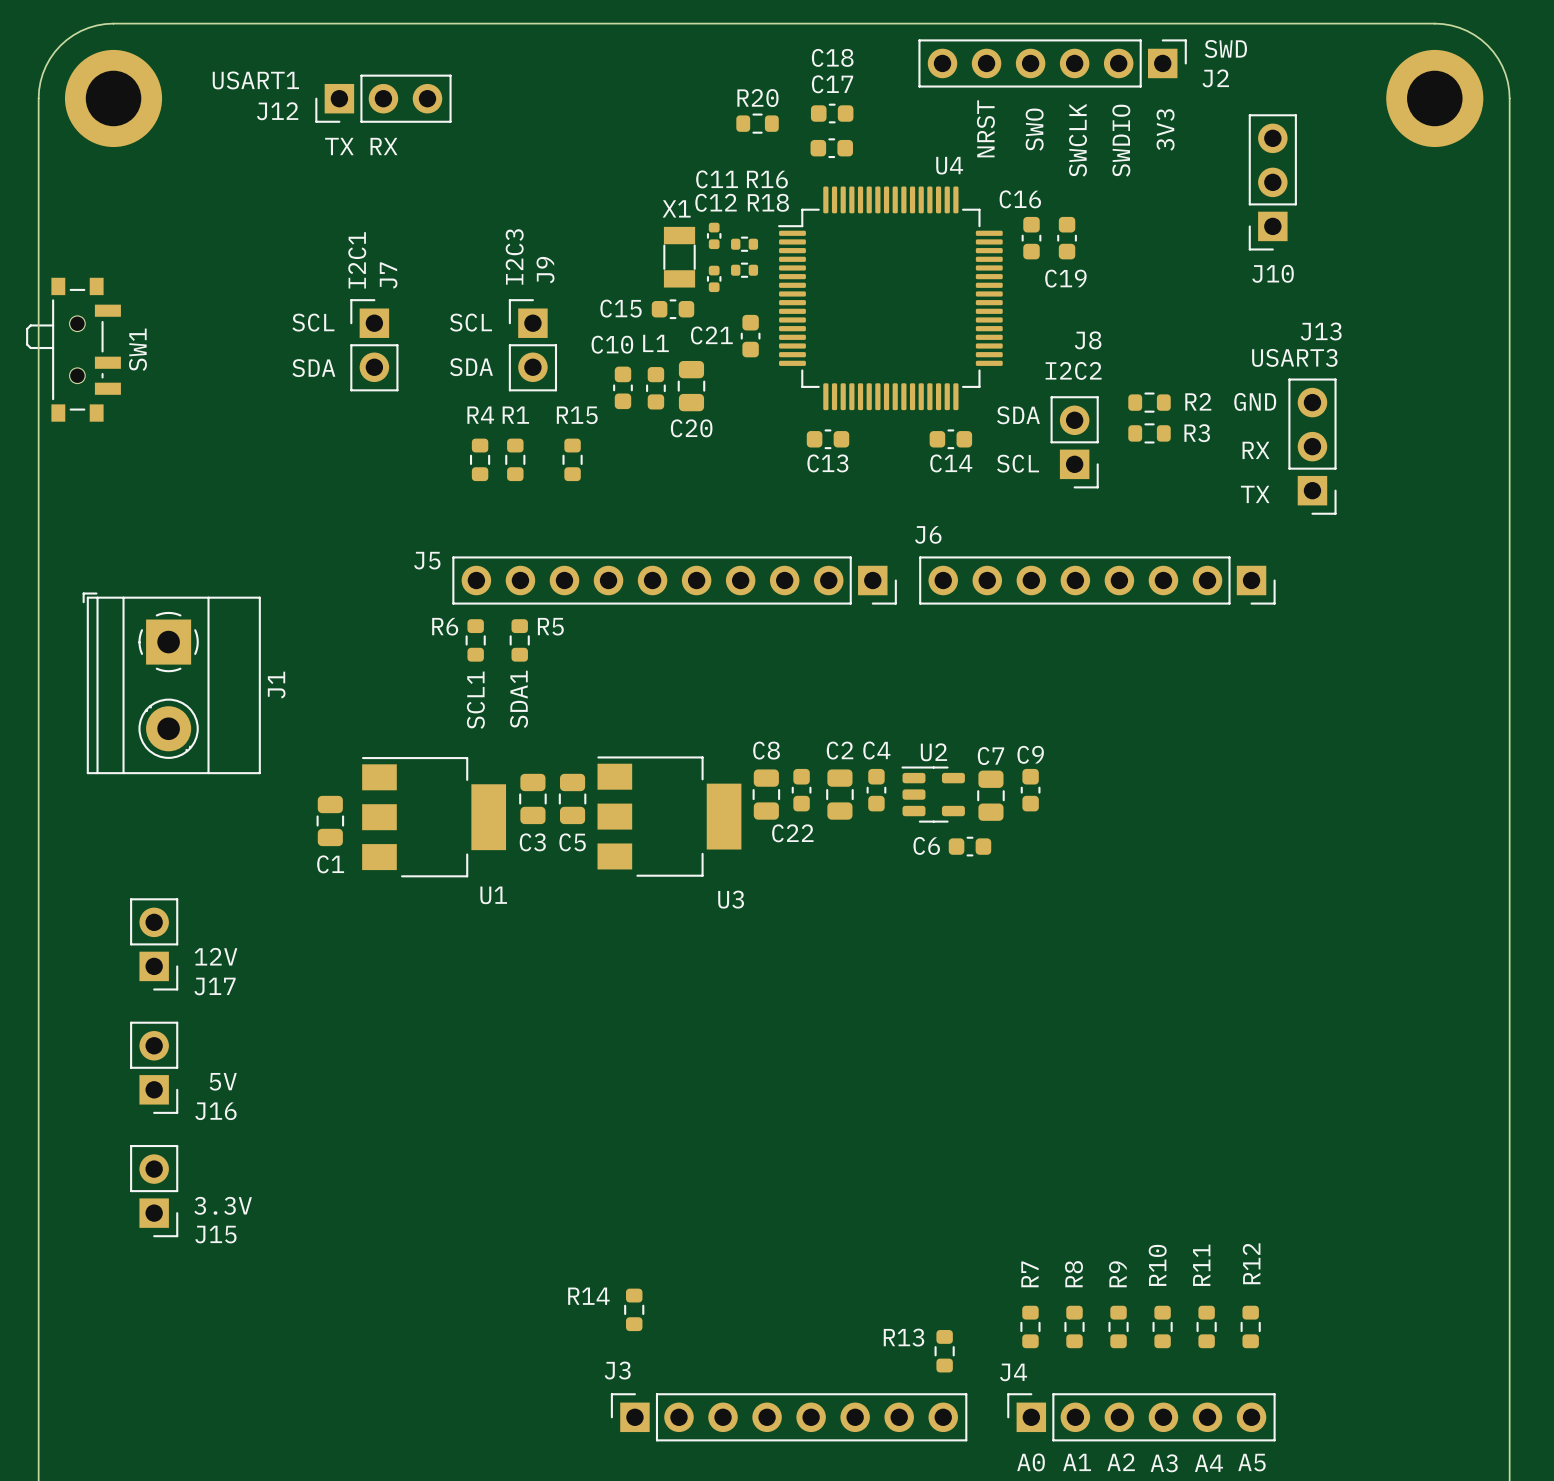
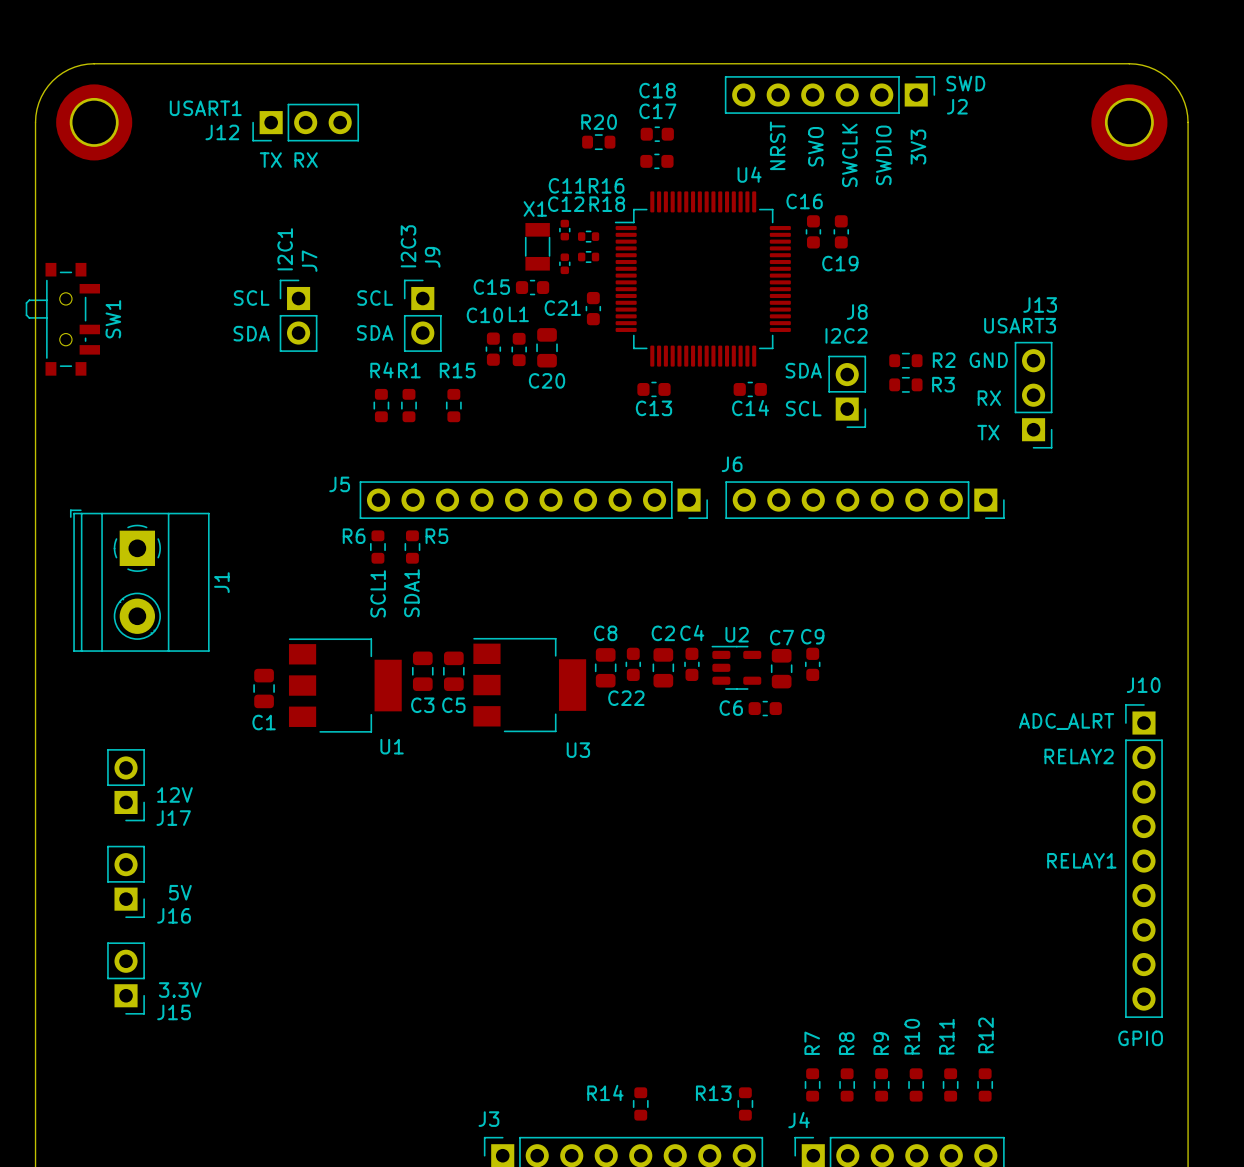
J10 footprint: [1248, 114, 1297, 251] -> [1125, 704, 1163, 1018]
J10 name position: J10 (1273, 273) -> J10 (1143, 685)
J10 value: none -> GPIO (1140, 1038)
R14 position: (634, 1309) -> (640, 1103)

